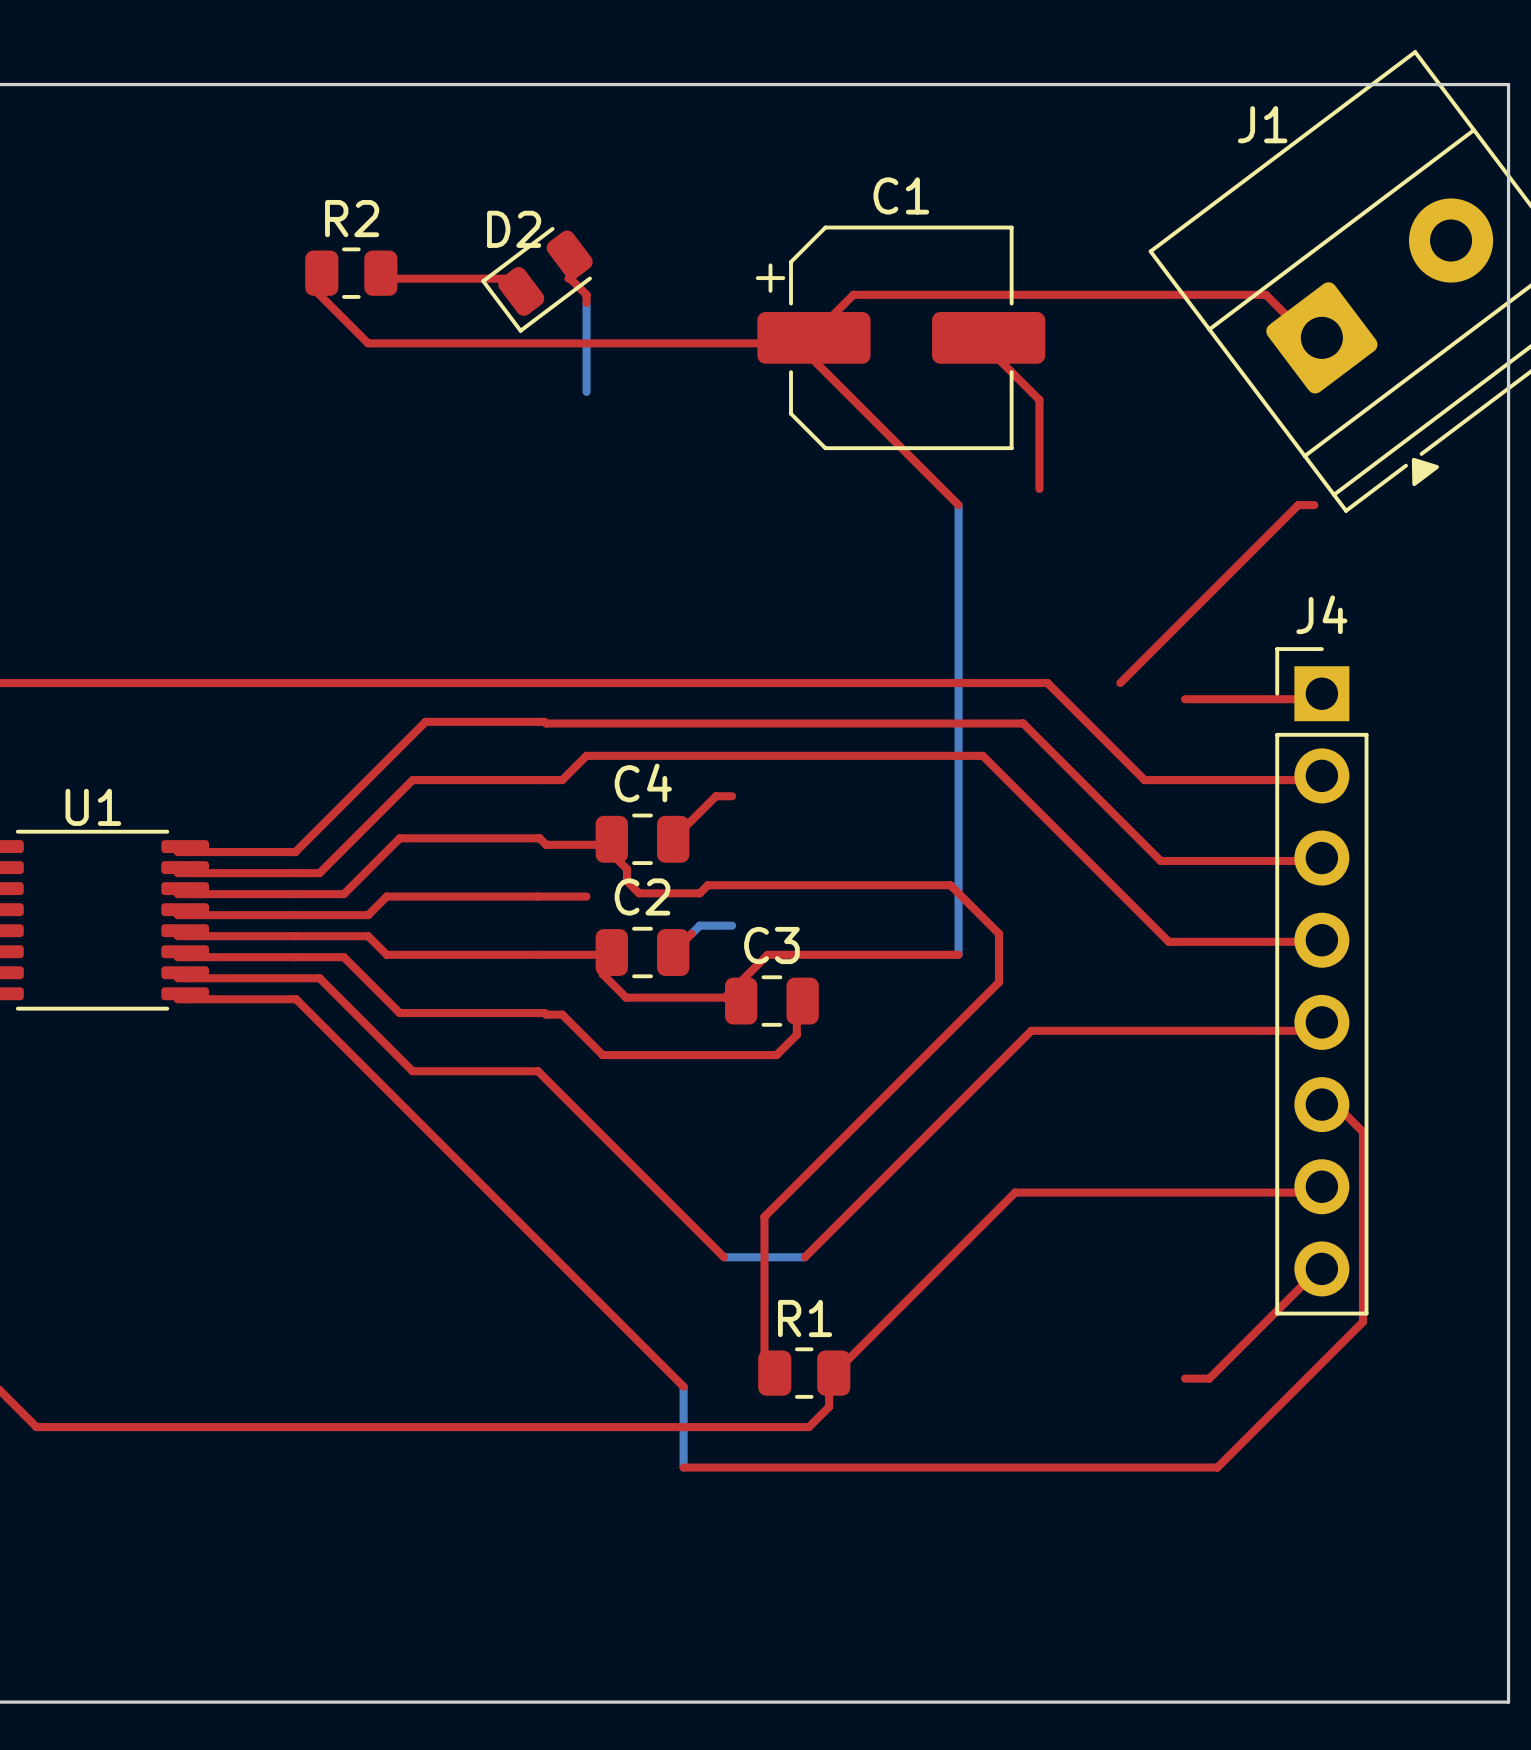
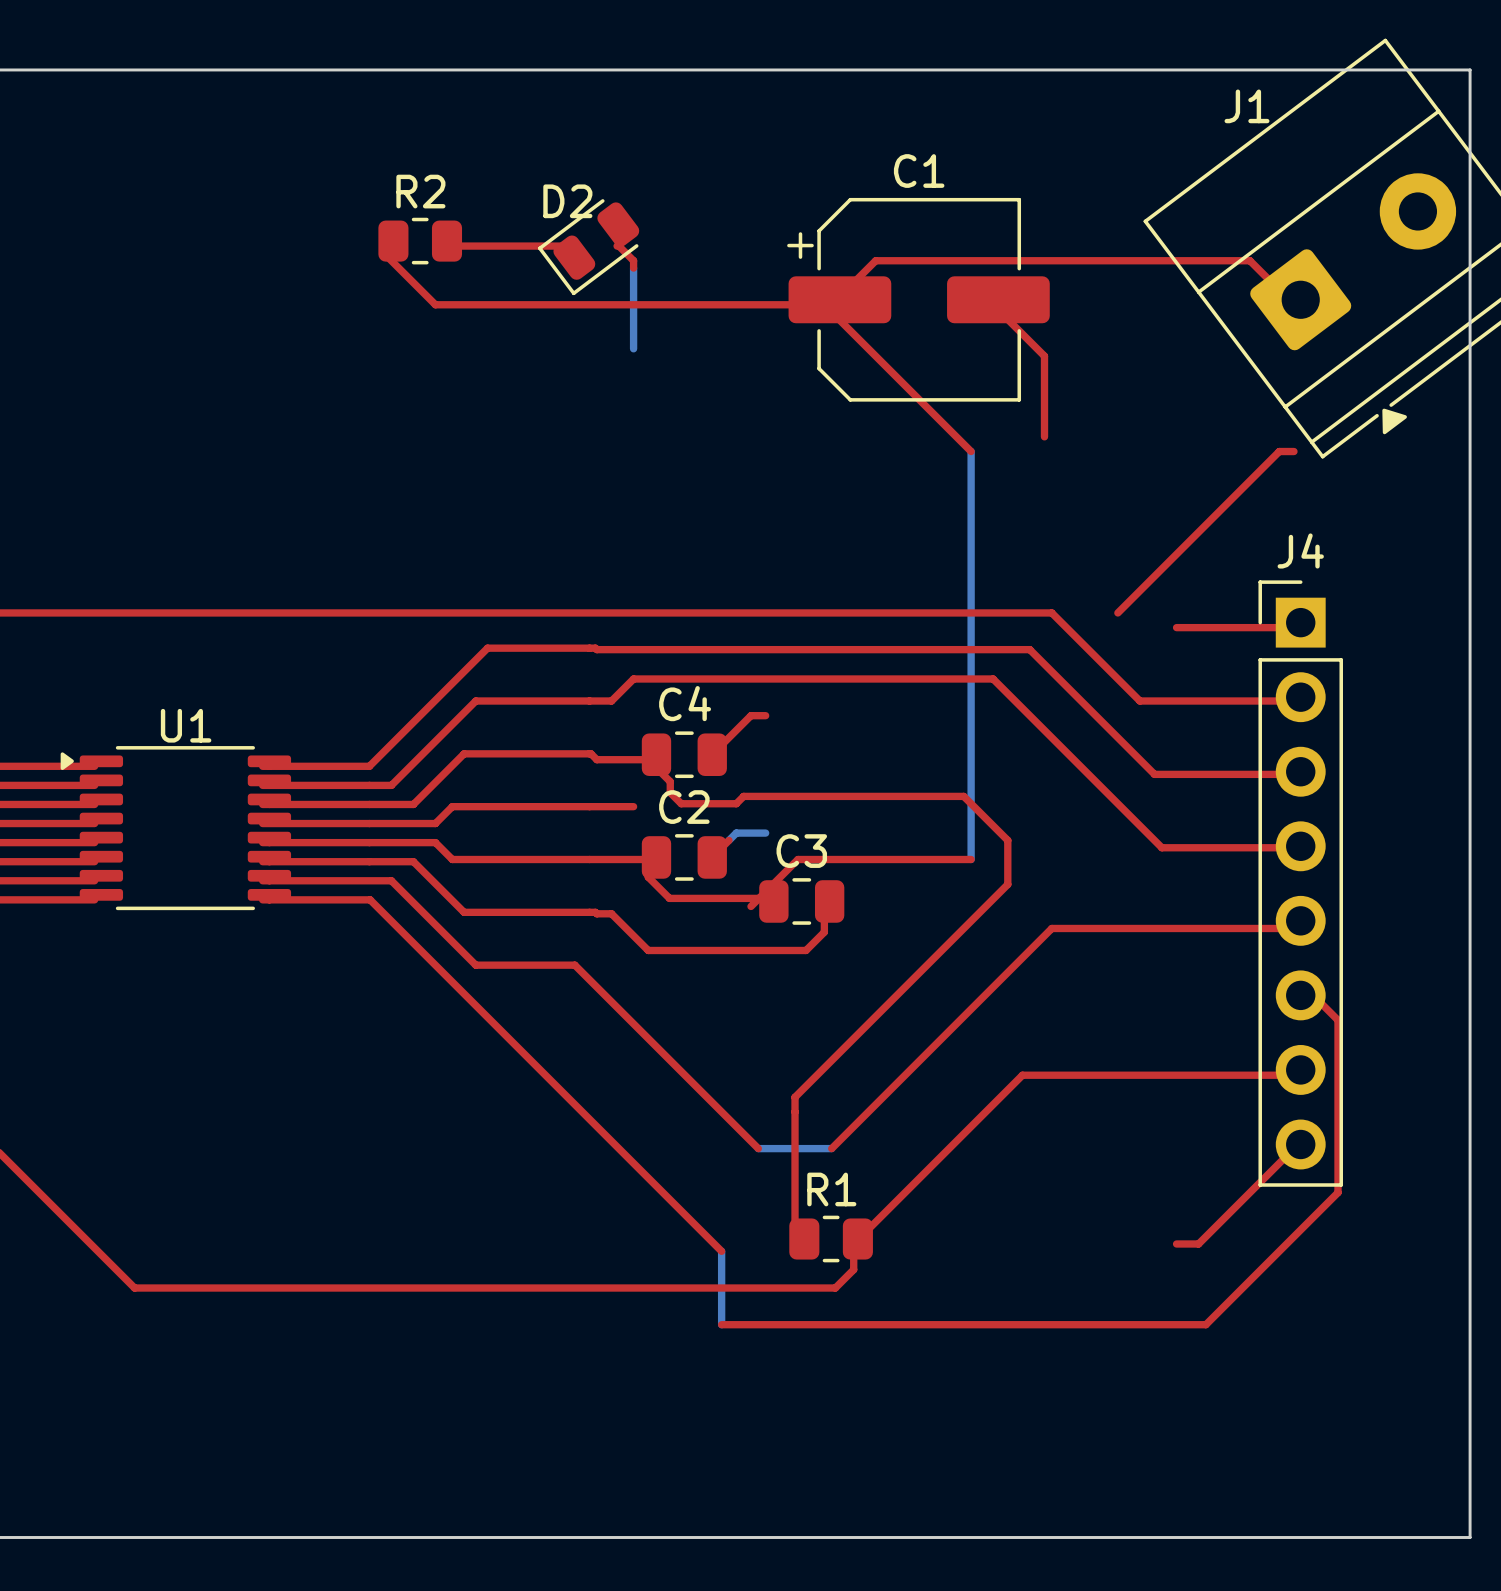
top track: none -> (759, 898) (750, 906)
top track: (1047, 1030) (1031, 1030) (804, 1257) -> (1051, 928) (831, 1148)
top track: (521, 1071) (538, 1071) (724, 1257) -> (574, 965) (758, 1148)
bottom track: (724, 1257) (804, 1257) -> (758, 1148) (831, 1148)

